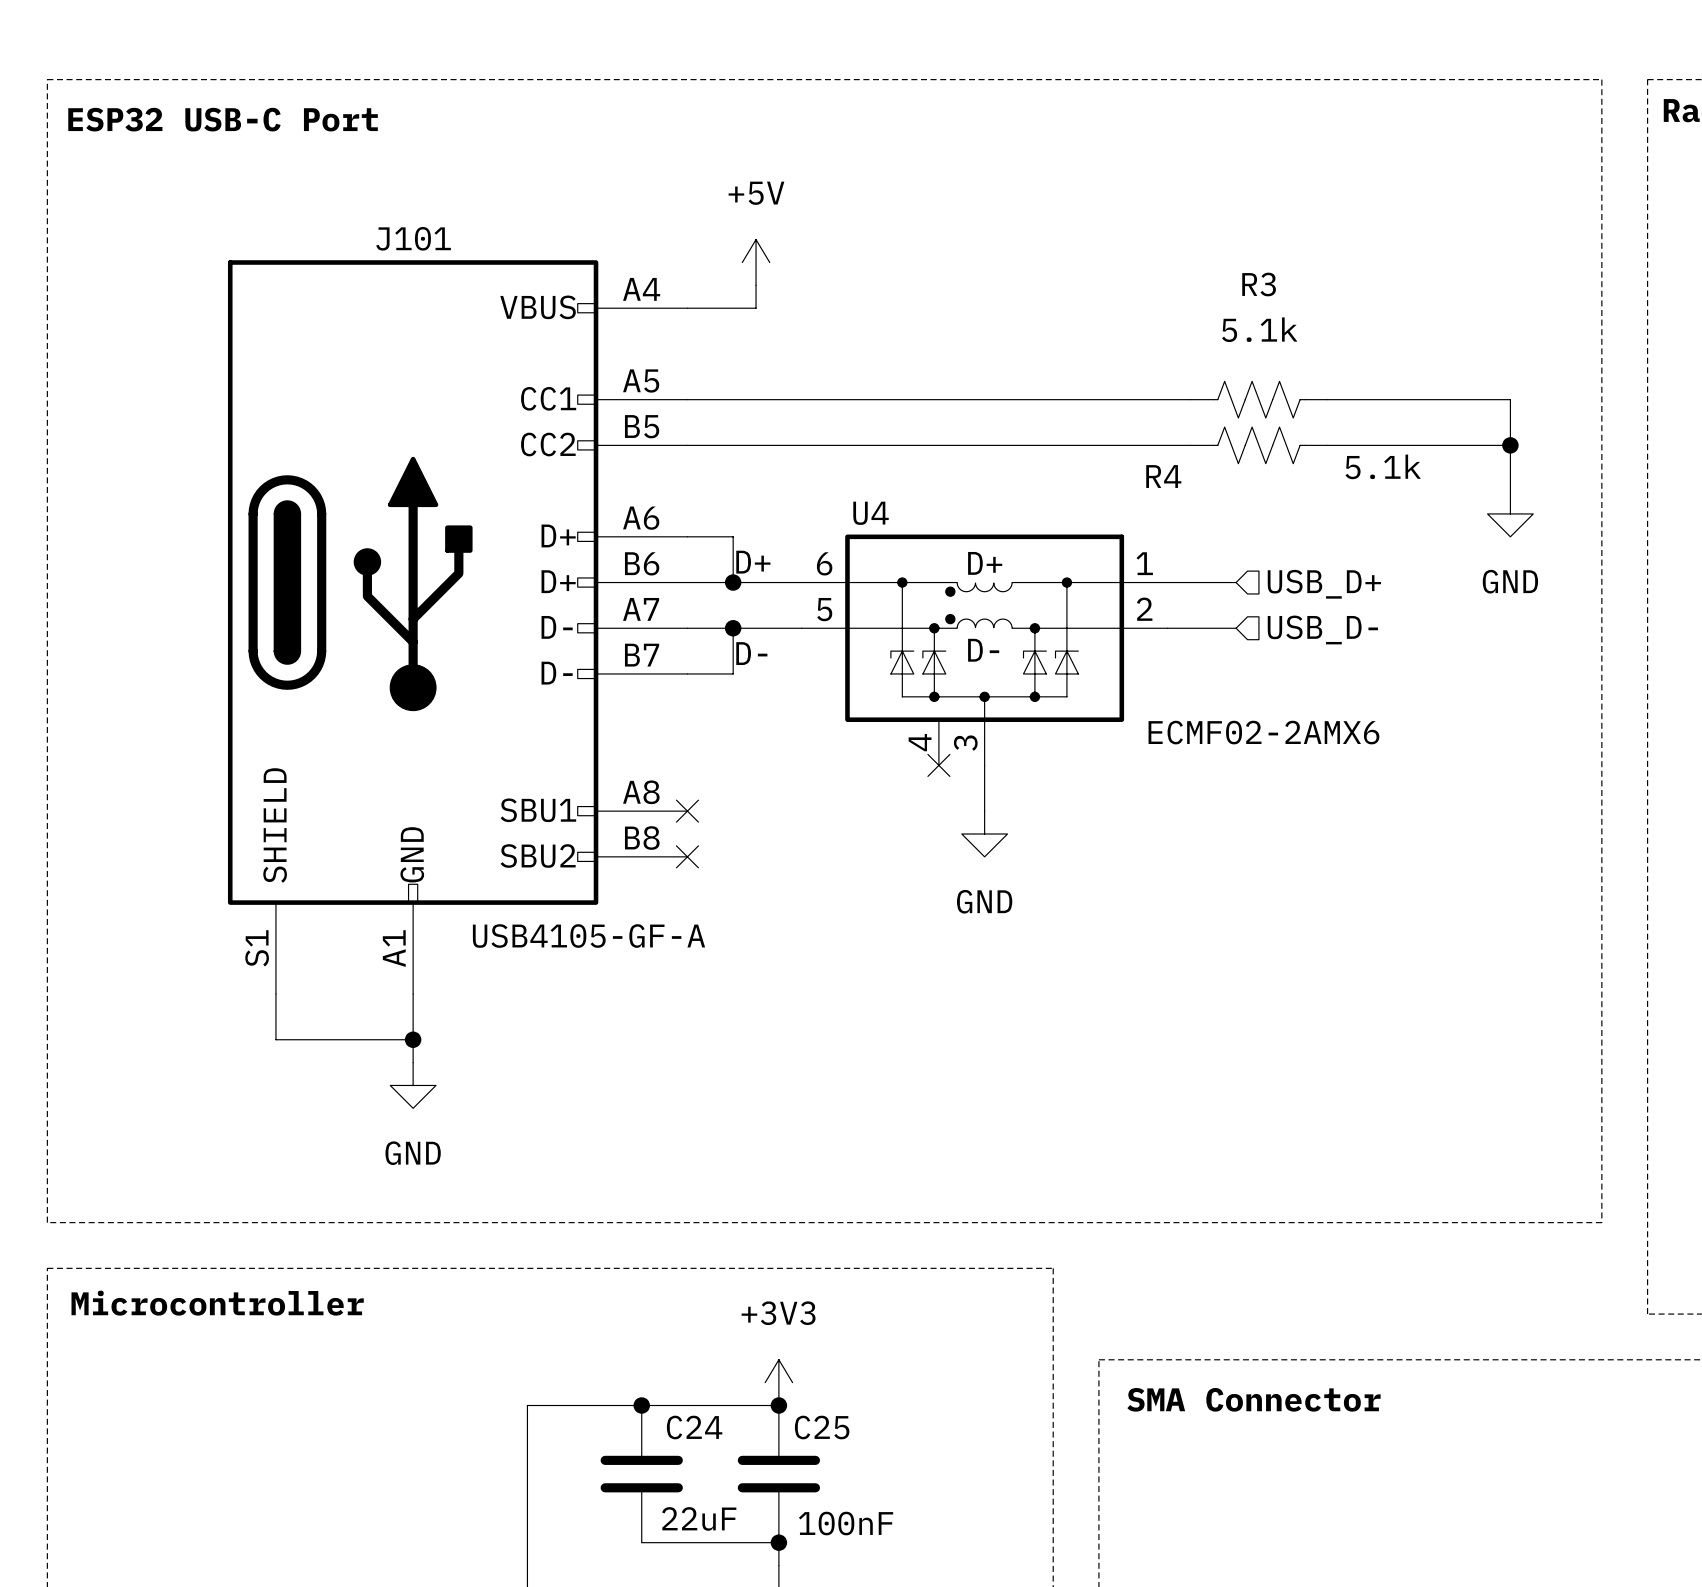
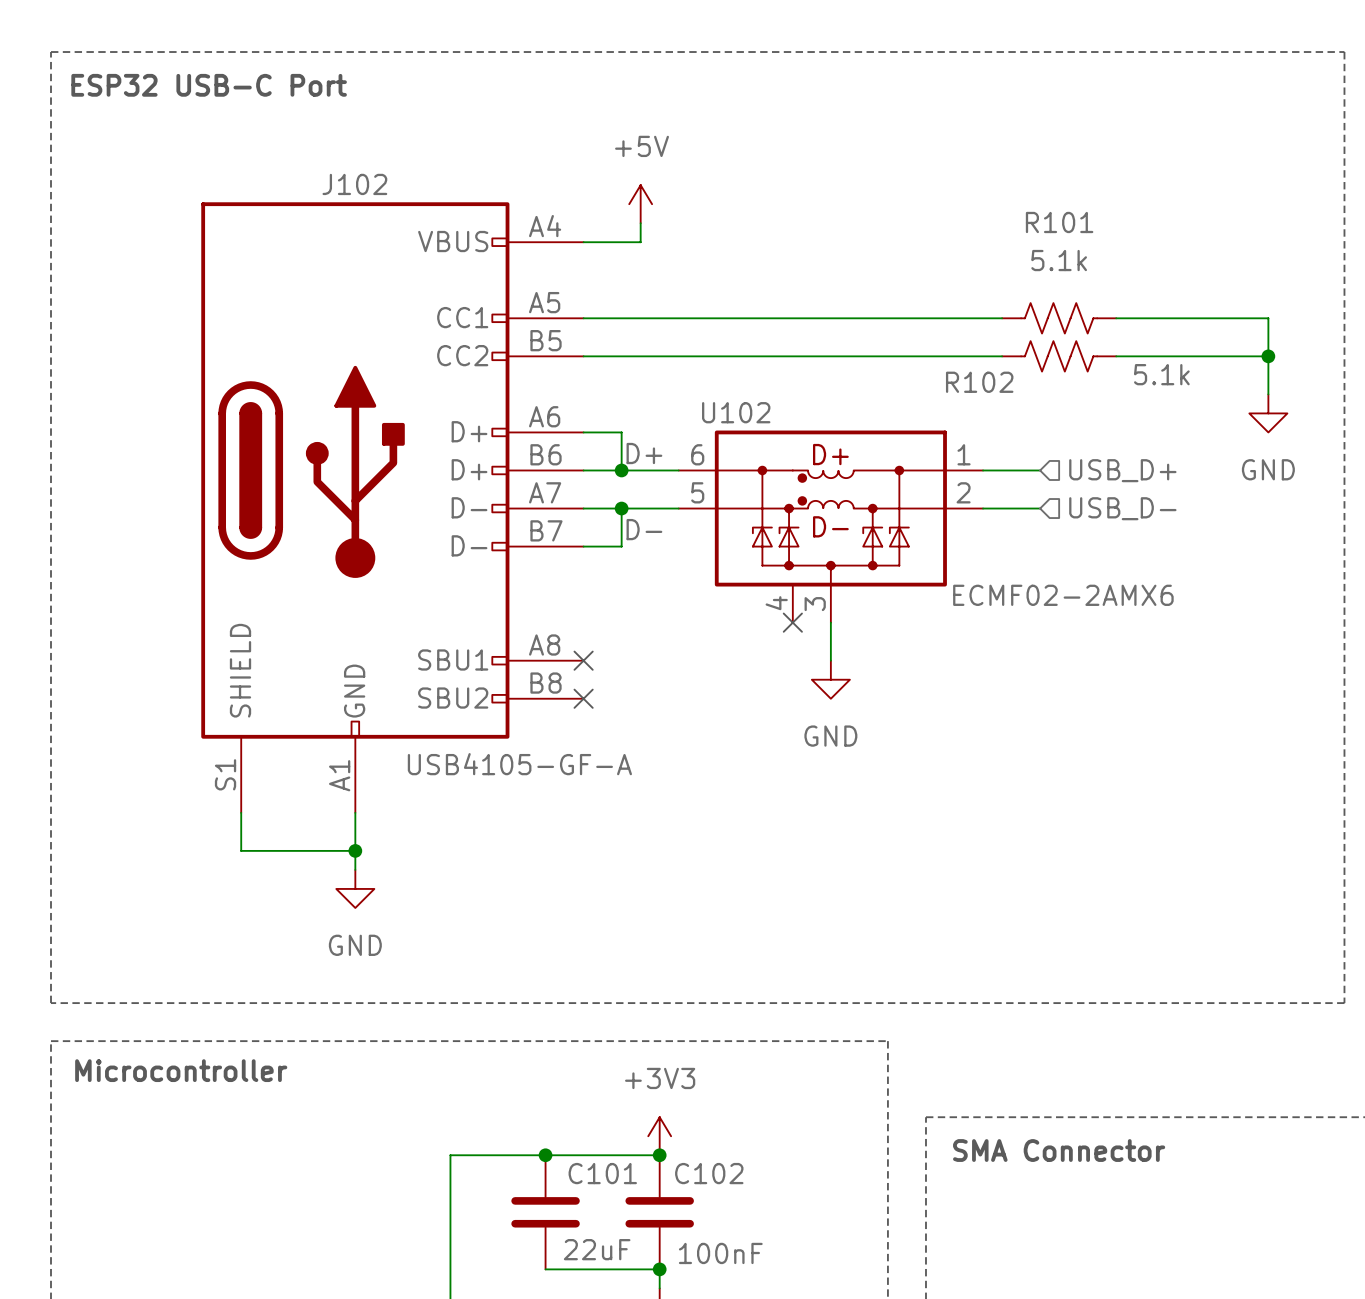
J101 name: J101 (413, 238) -> J102 (354, 184)
R3 name: R3 (1259, 284) -> R101 (1059, 222)
R4 name: R4 (1163, 476) -> R102 (979, 382)
U4 name: U4 (871, 513) -> U102 (736, 412)
C24 name: C24 (694, 1427) -> C101 (602, 1173)
C25 name: C25 (822, 1427) -> C102 (709, 1173)

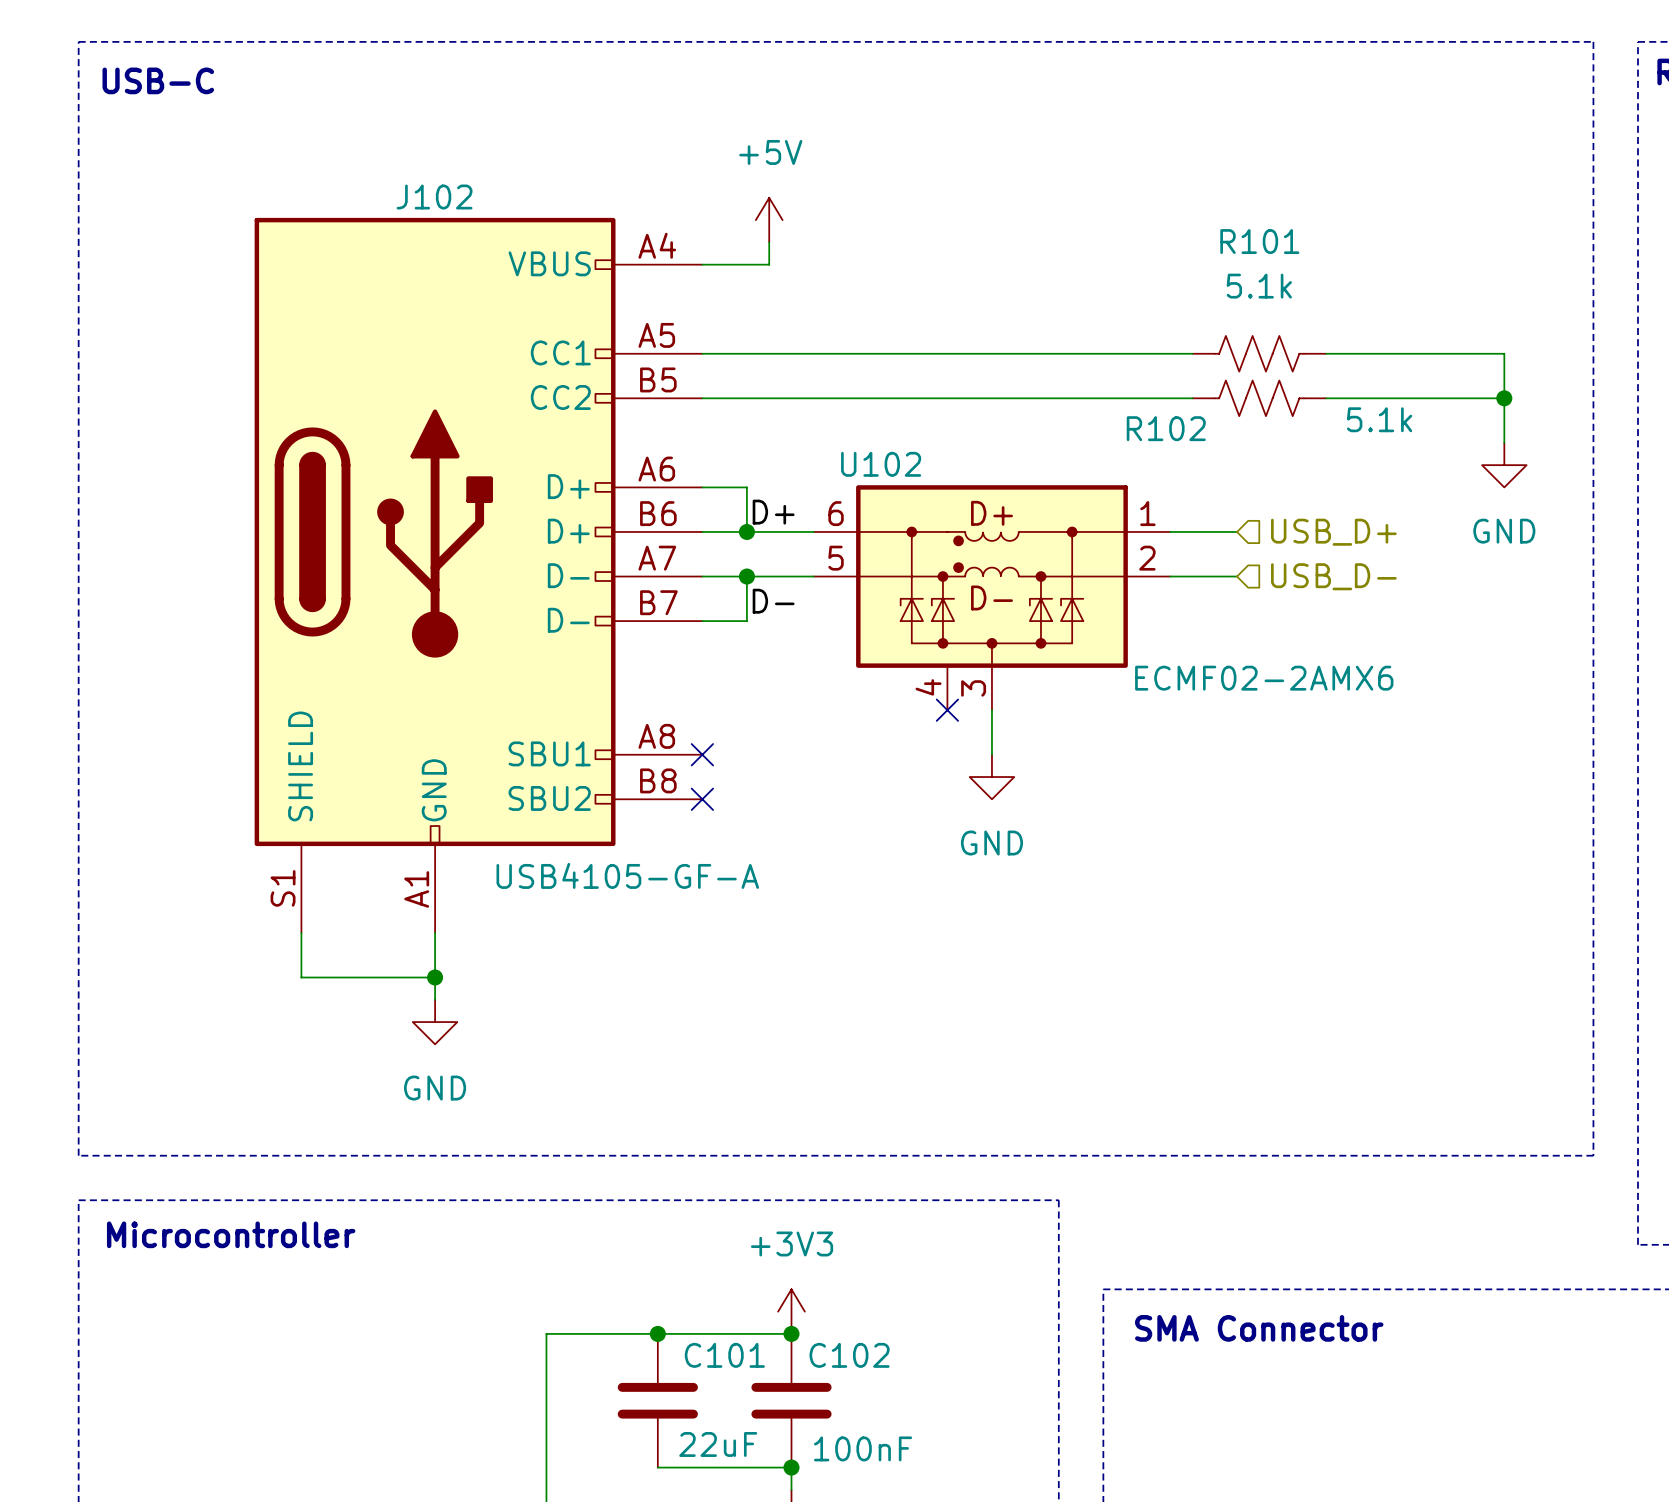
text: ESP32 USB-C Port (209, 85) -> USB-C (158, 80)

